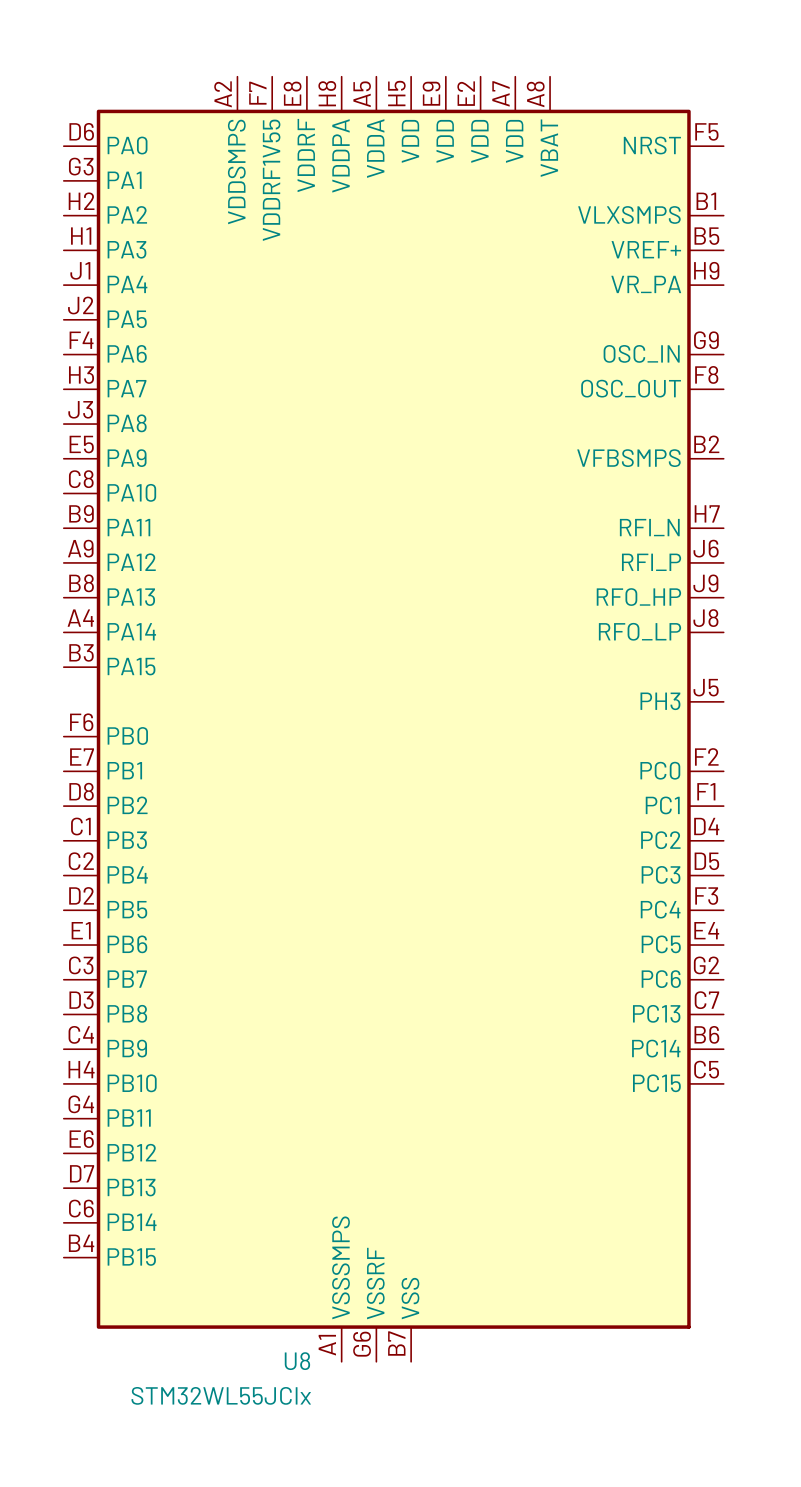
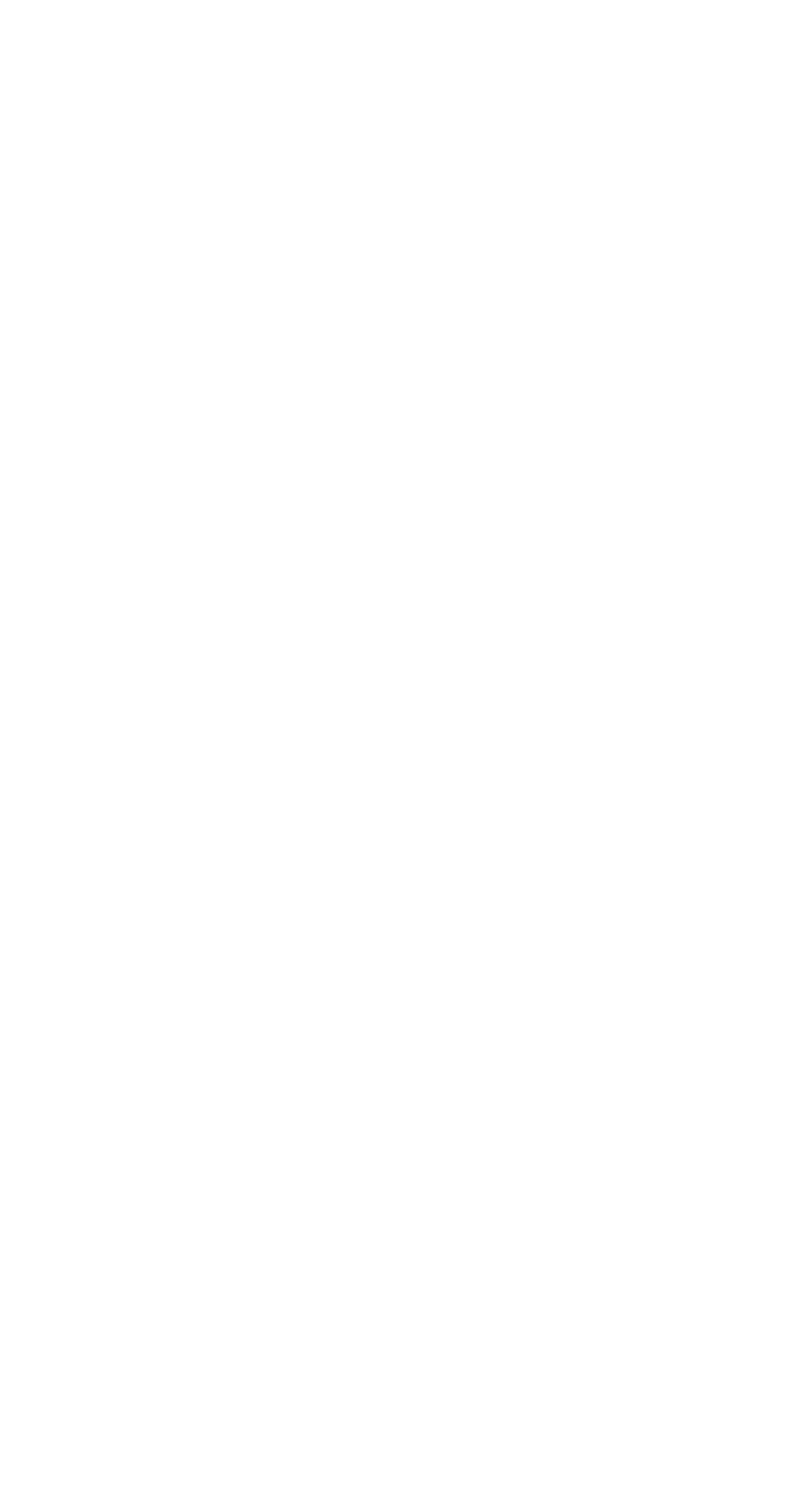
U8: STM32WL55JCIx (393, 719) -> none

